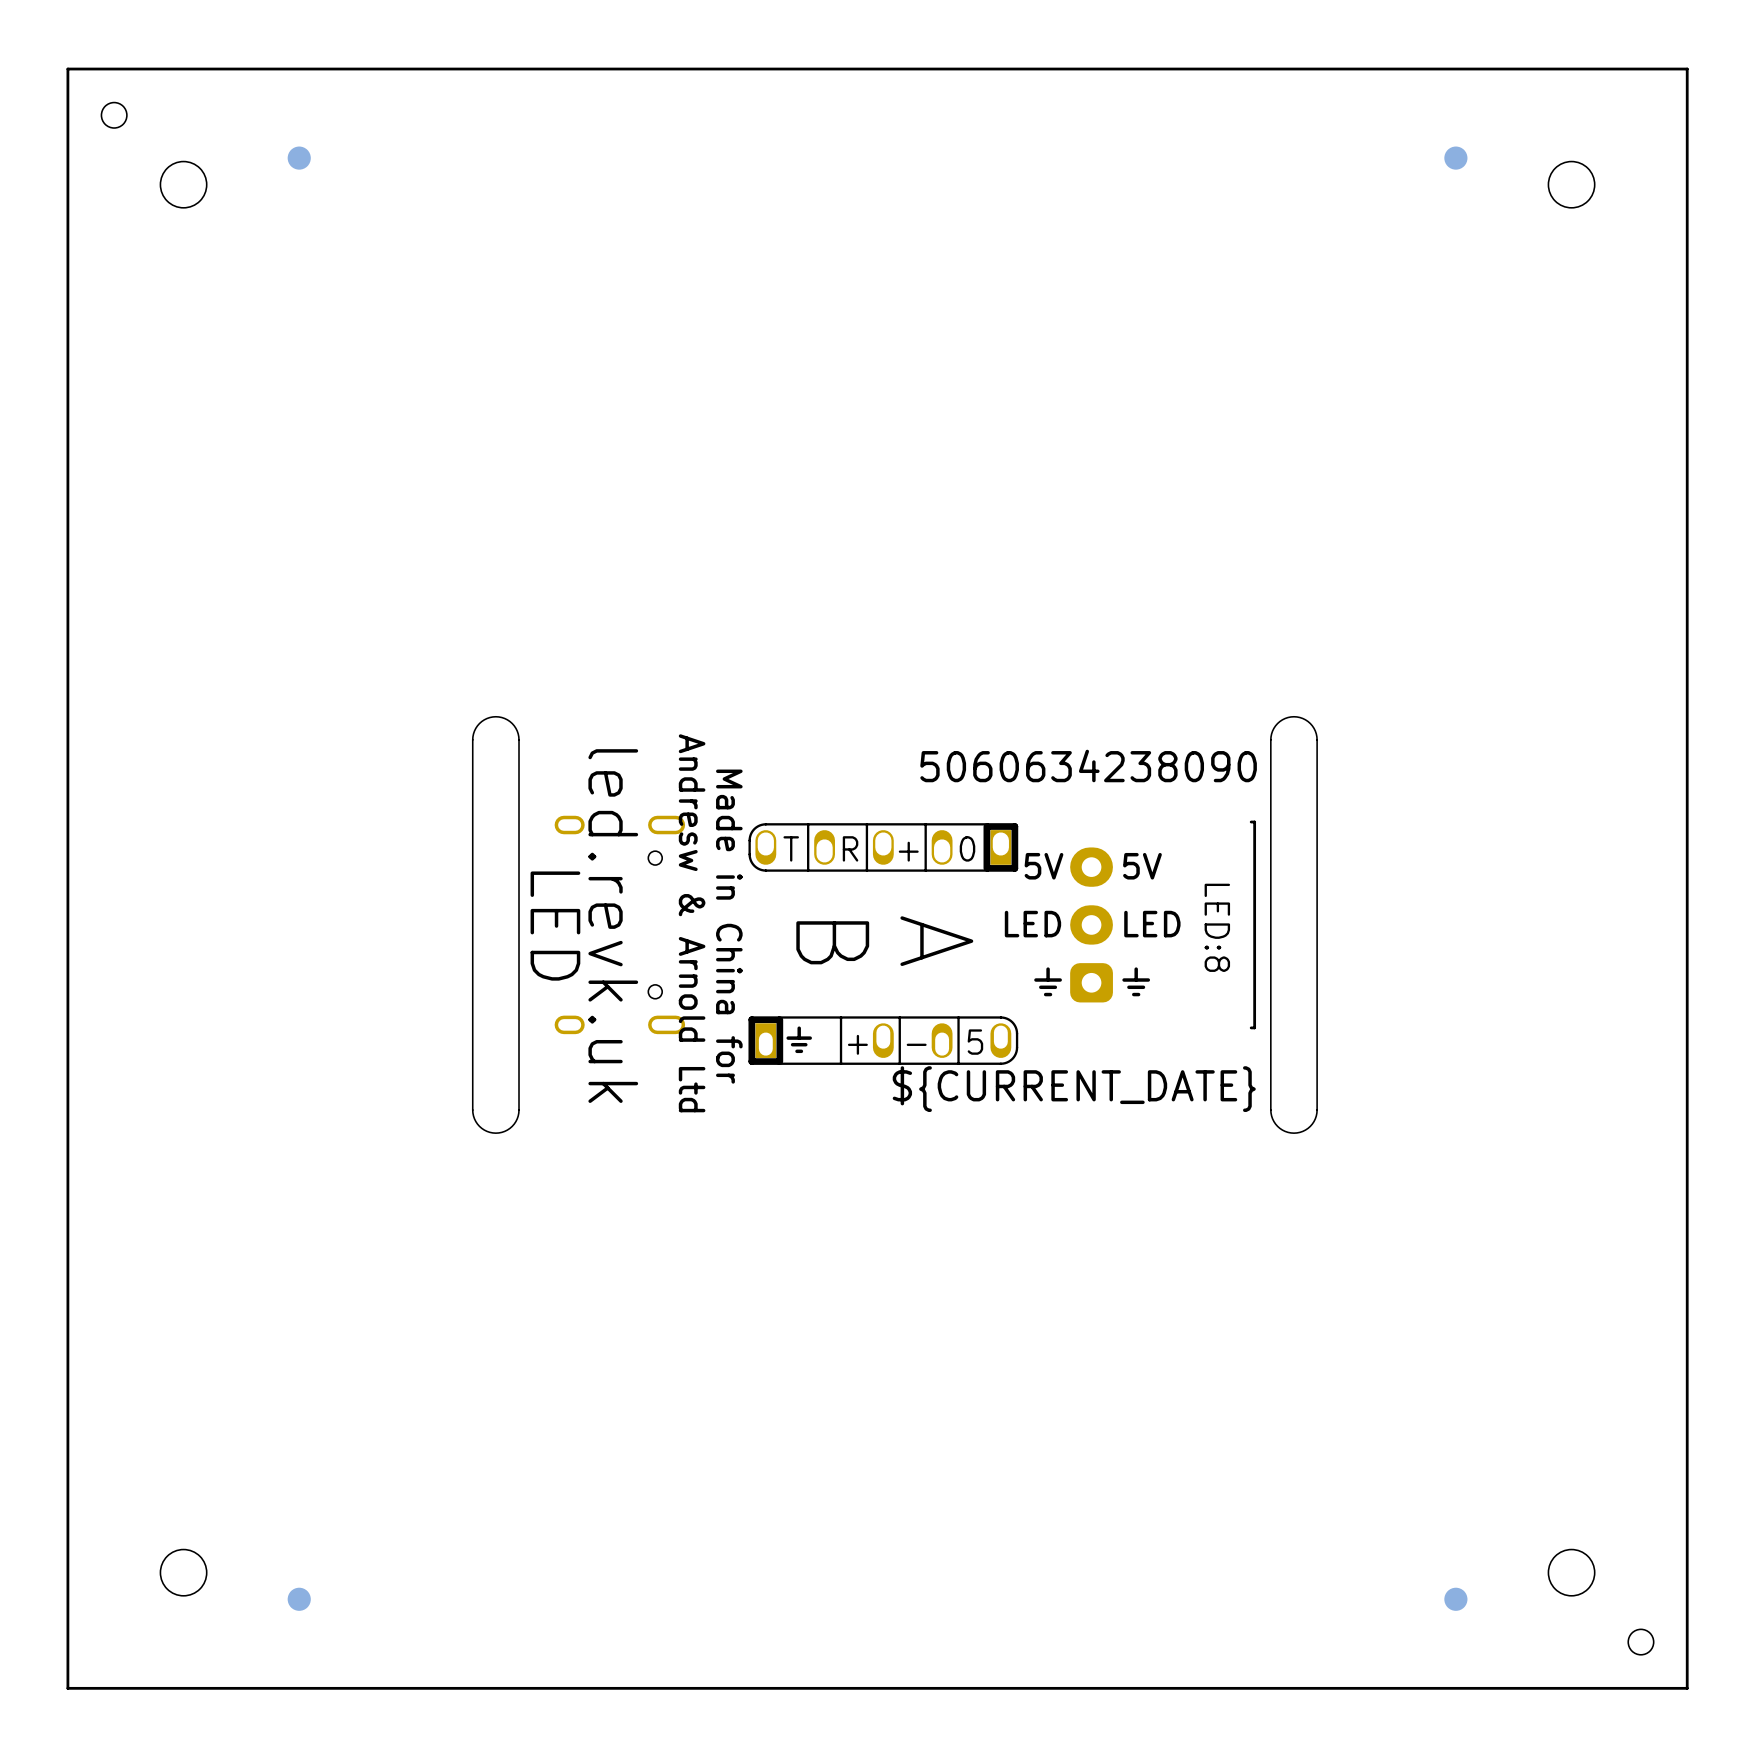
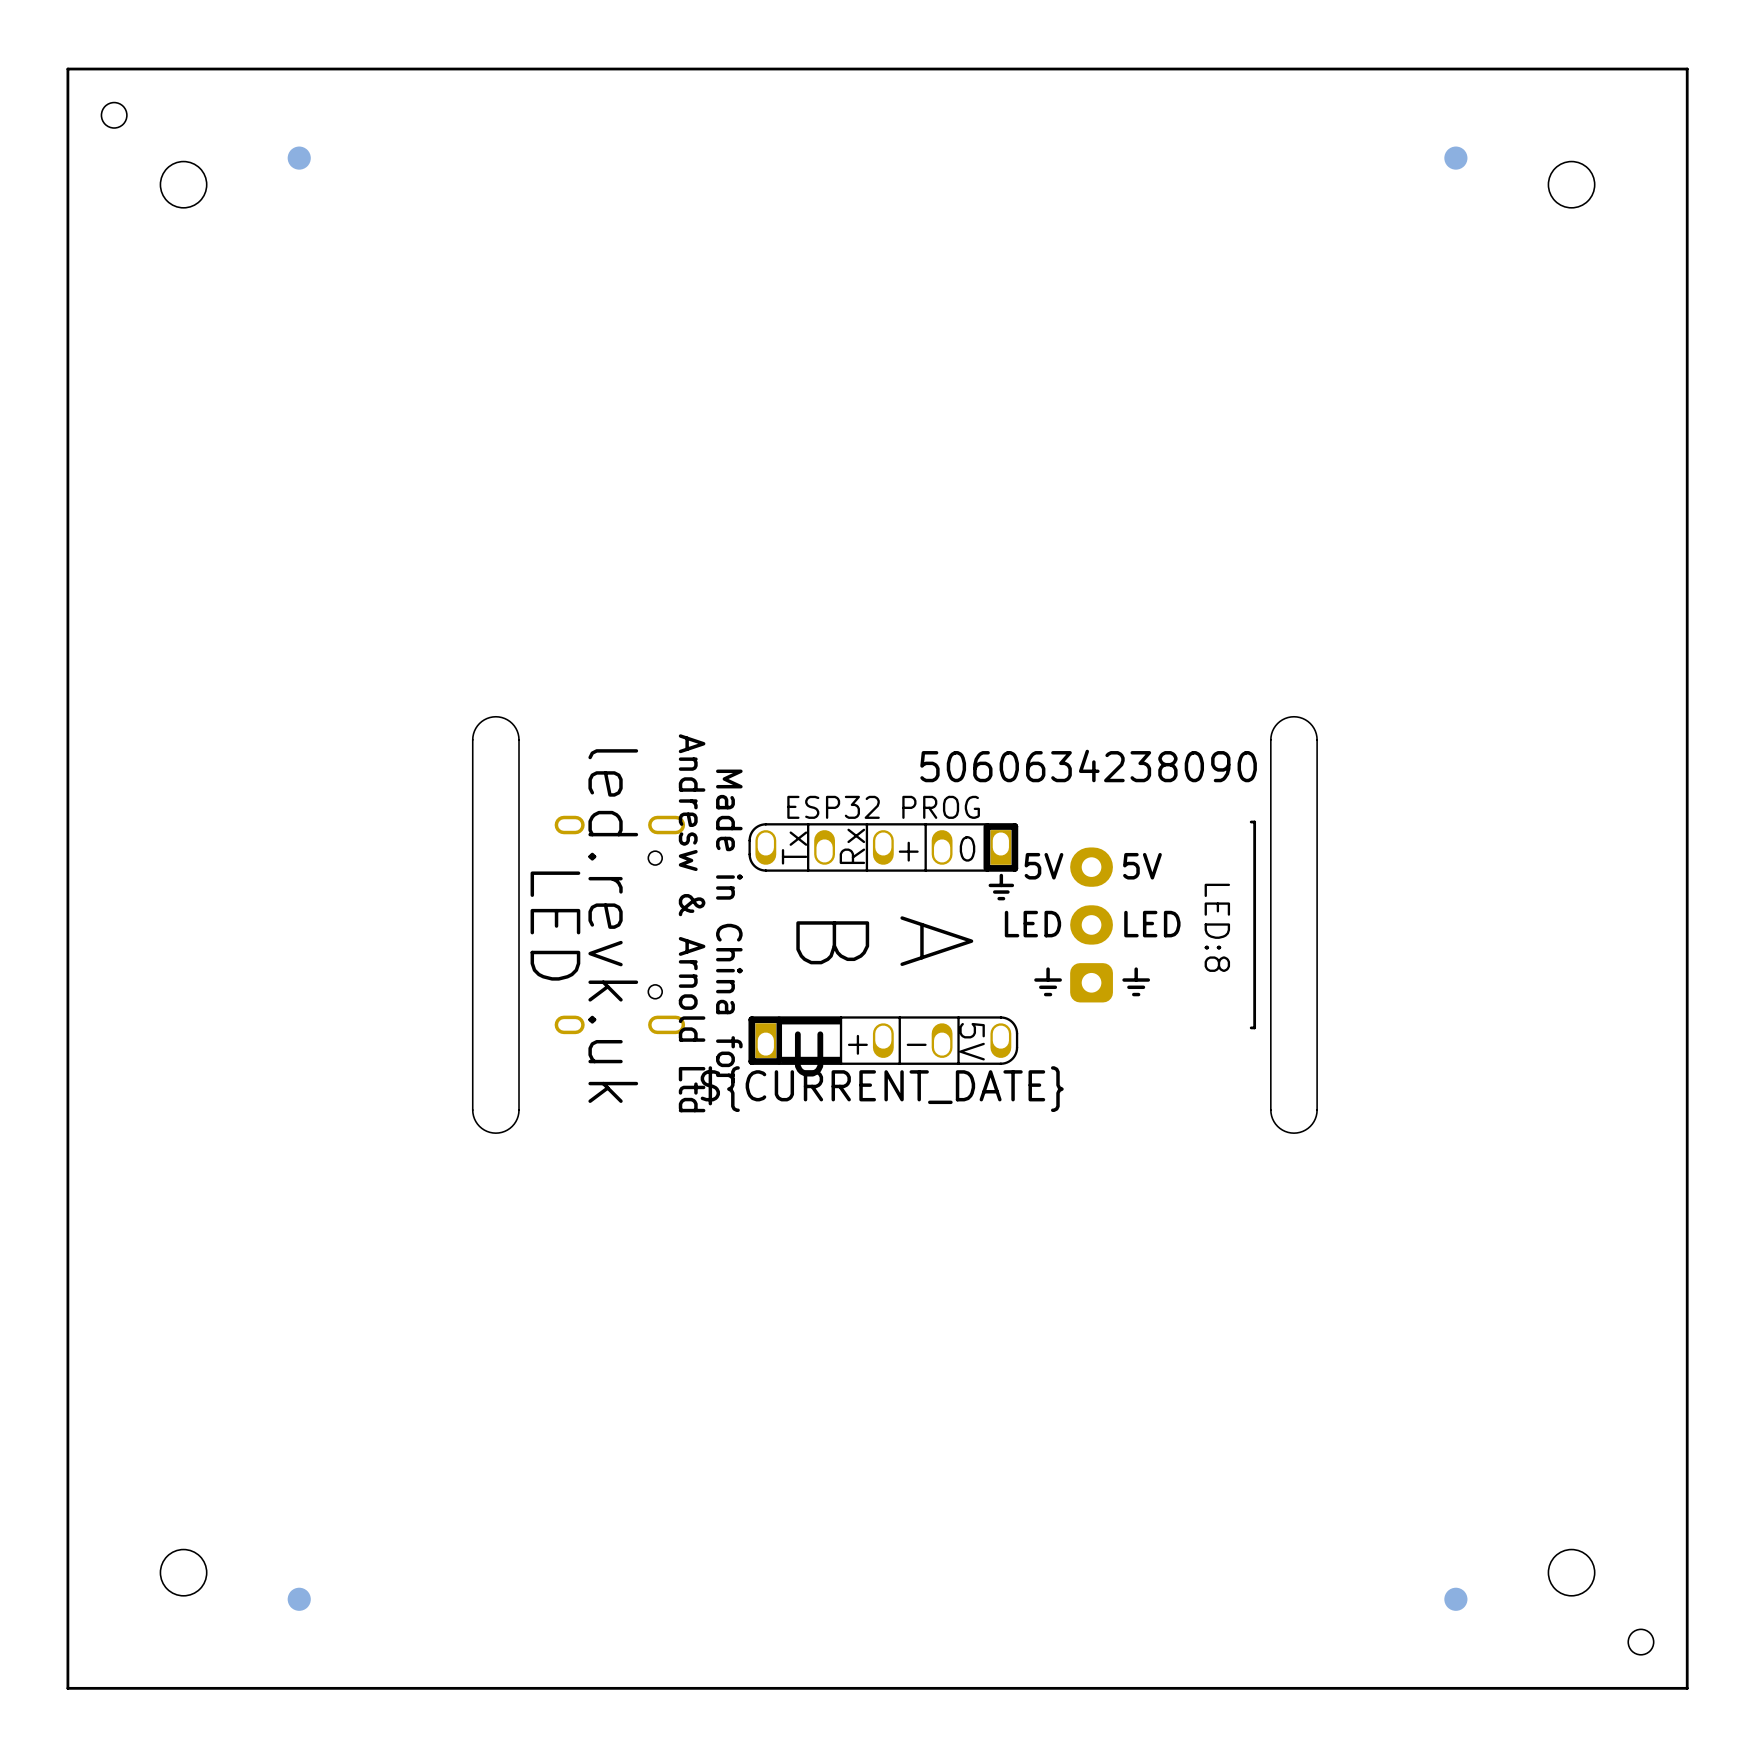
part text: none -> ESP32 PROG (883, 807)
part text: none -> Rx (852, 846)
part text: T (791, 848) -> none
part text: none -> Tx (794, 848)
part text: R (850, 848) -> none
part text: none -> ⏚ (1001, 887)
part footprint: [748, 1016, 1019, 1065] -> [748, 1016, 1019, 1065]
text position: ${CURRENT_DATE} (1074, 1089) -> ${CURRENT_DATE} (882, 1089)

